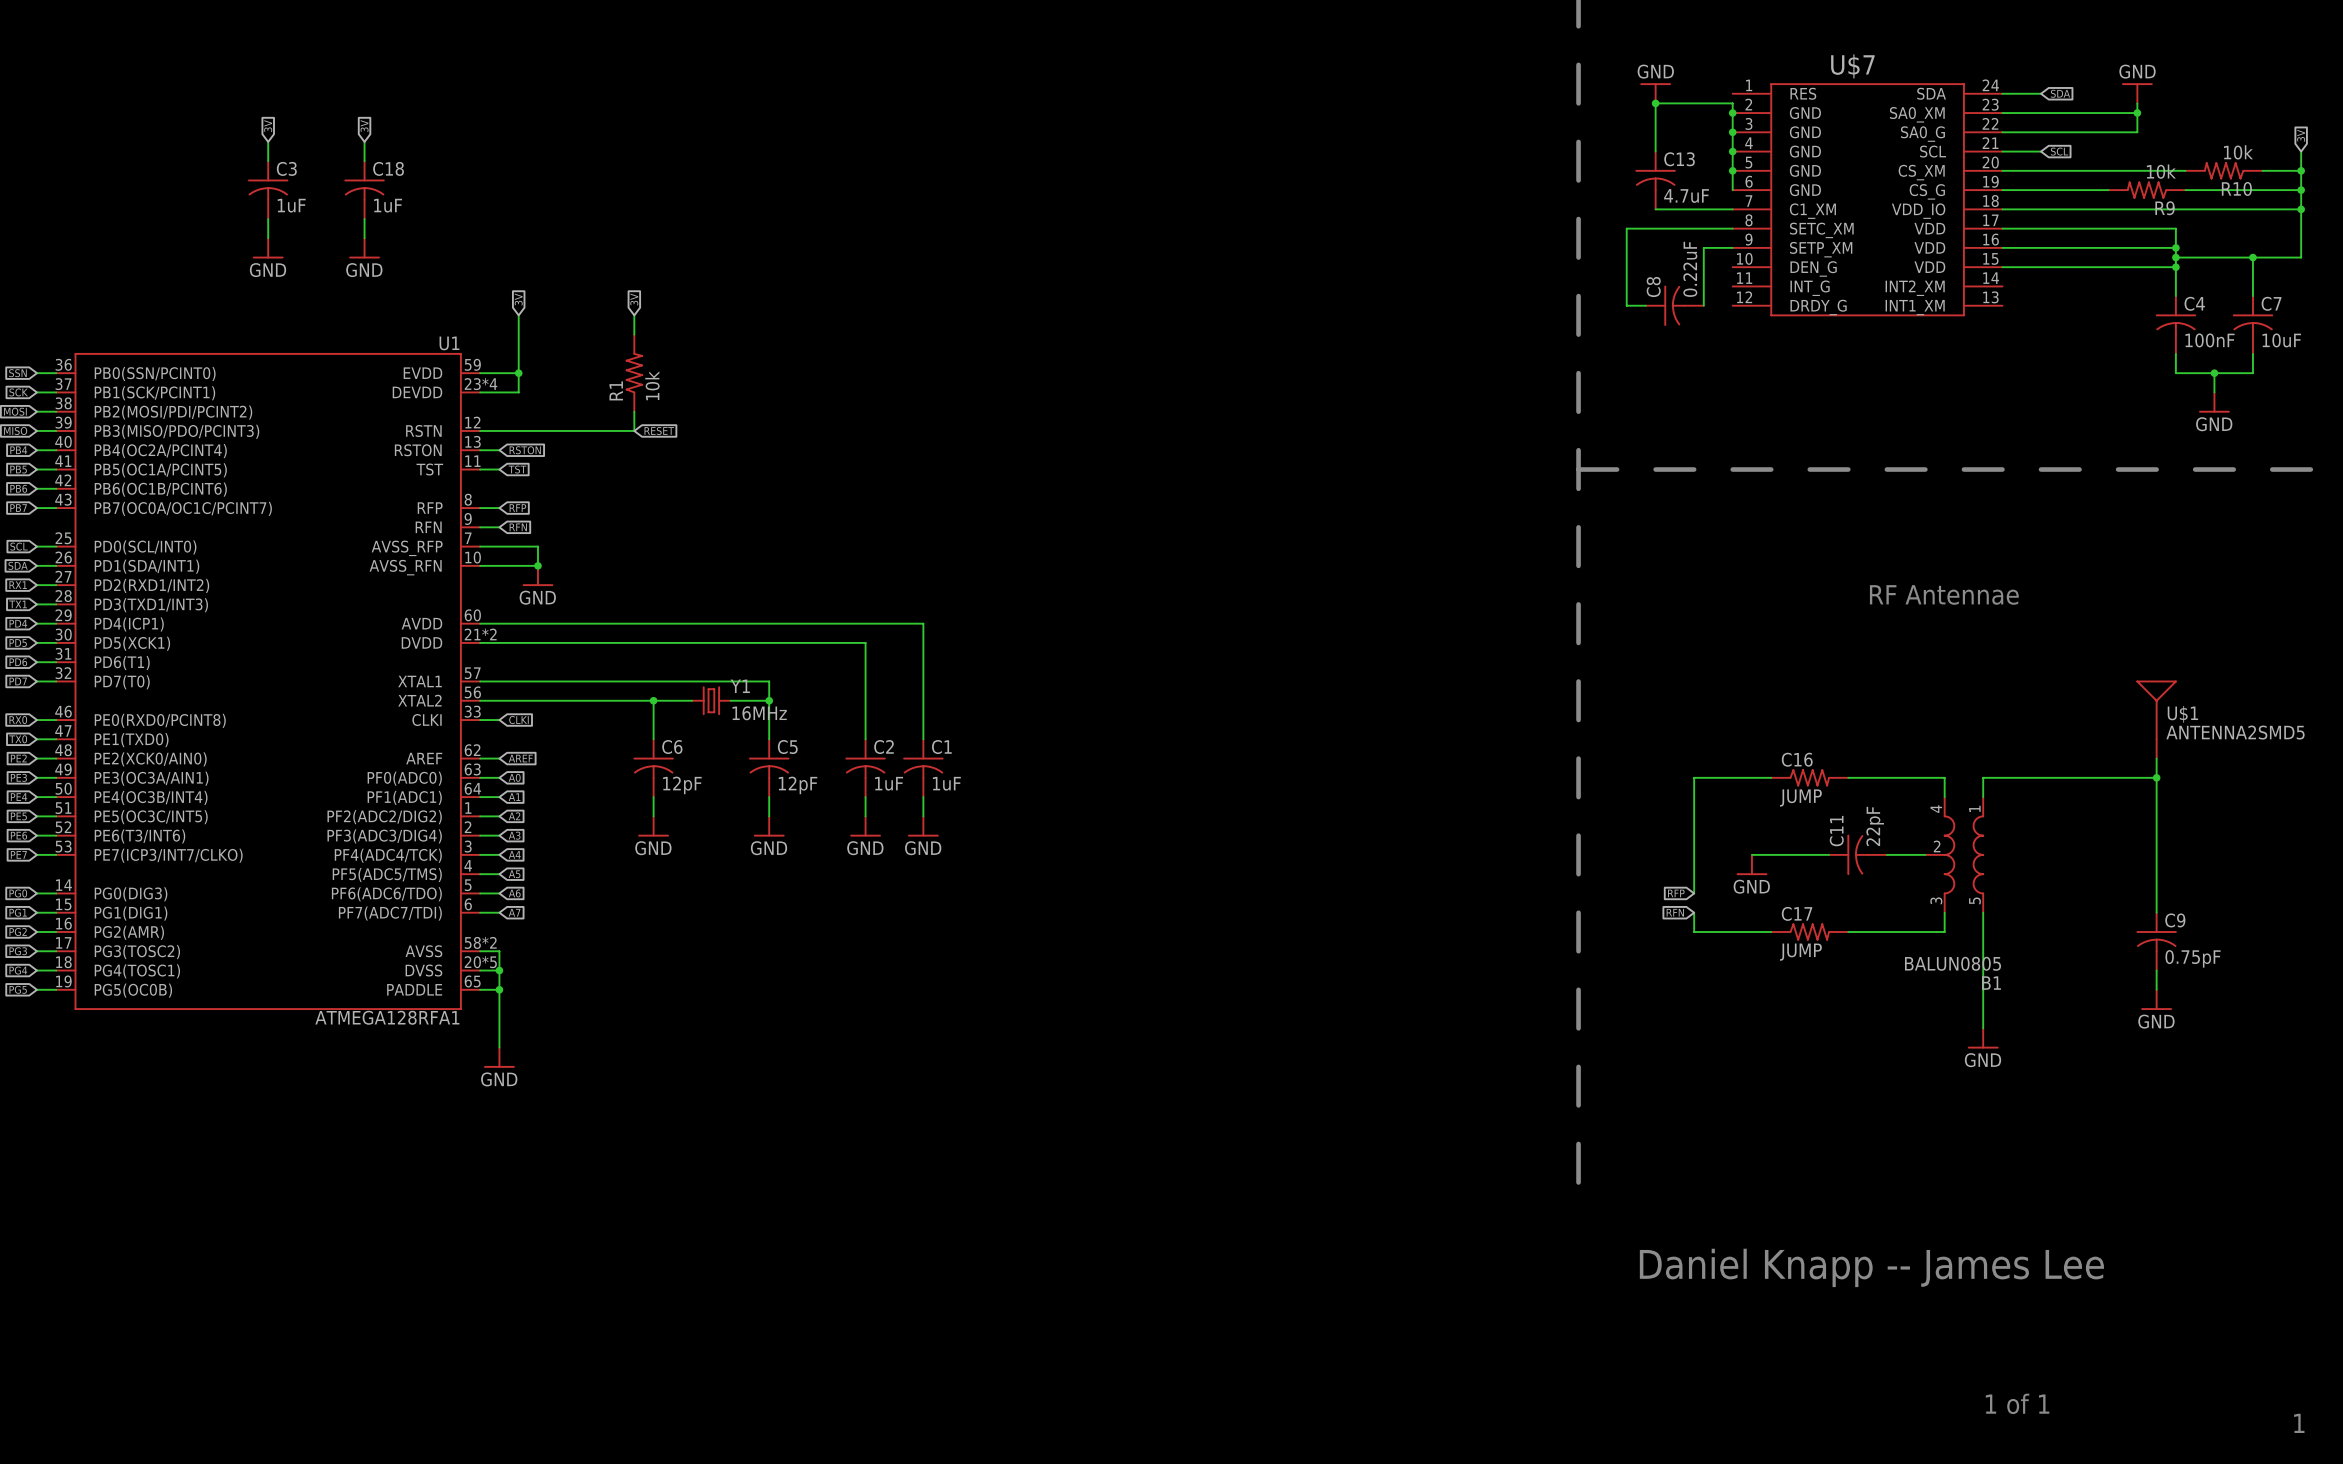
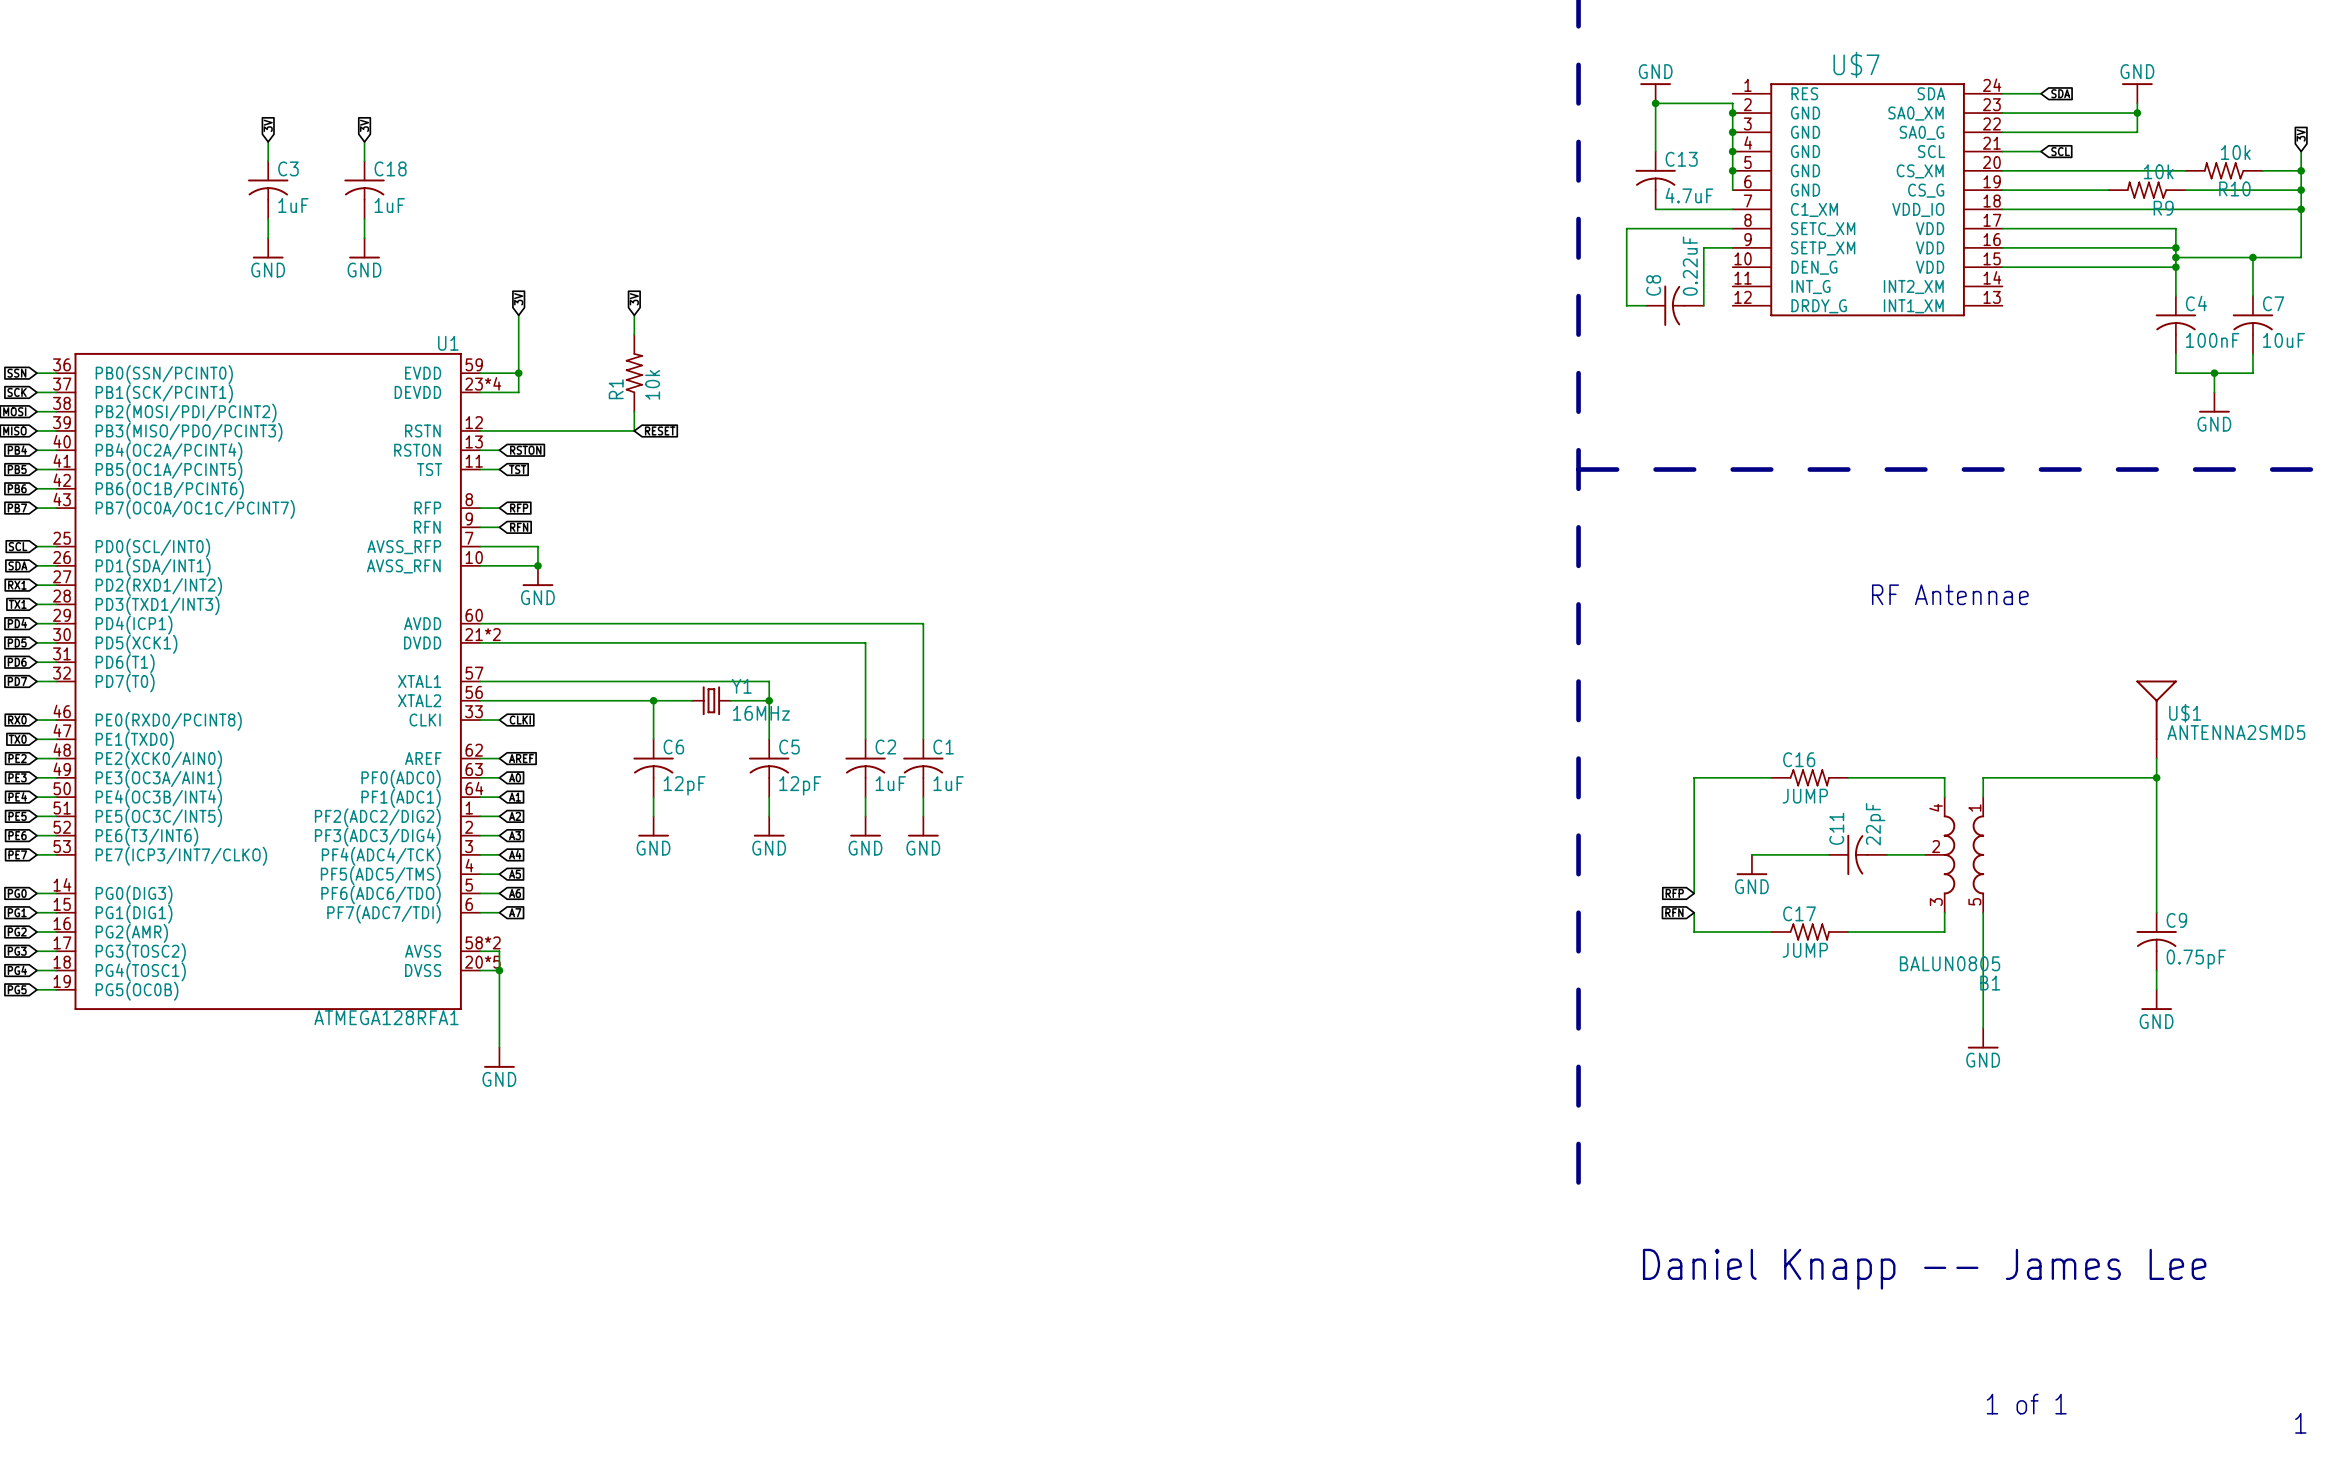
U1 symbol: [56, 352, 481, 1011] -> [56, 352, 481, 1011]
wire: (480, 989) (499, 989) -> none
junction: (499, 989) -> none

